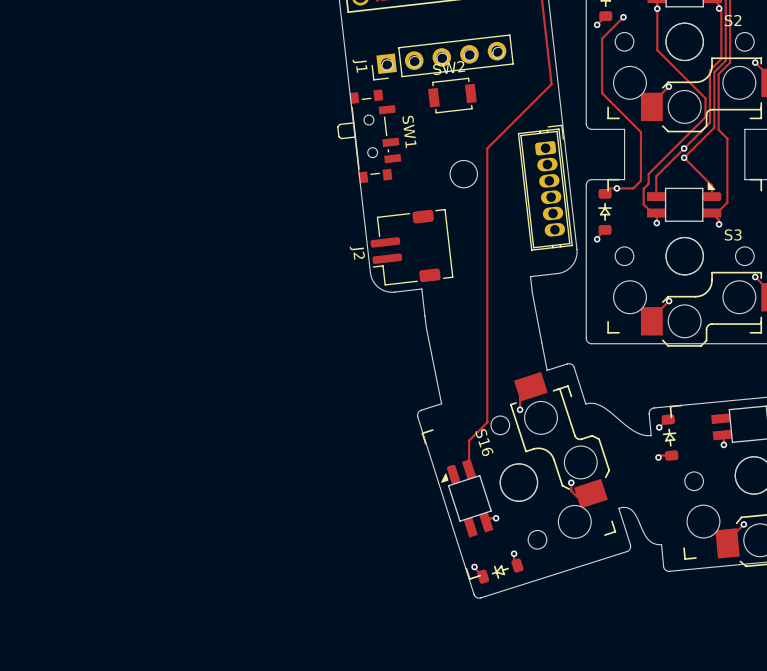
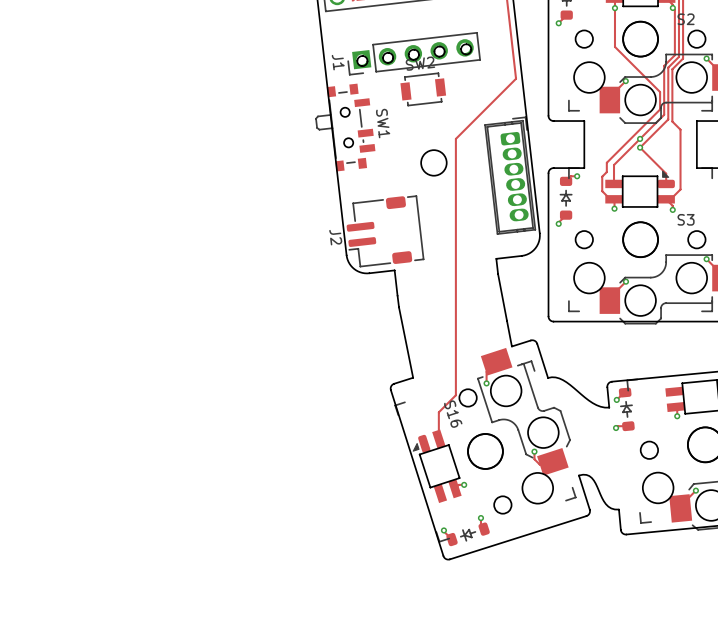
track: (623, 17) (602, 38) (602, 93) (640, 132) (640, 180) (633, 188) (616, 188) -> none
via: (623, 17) -> none

